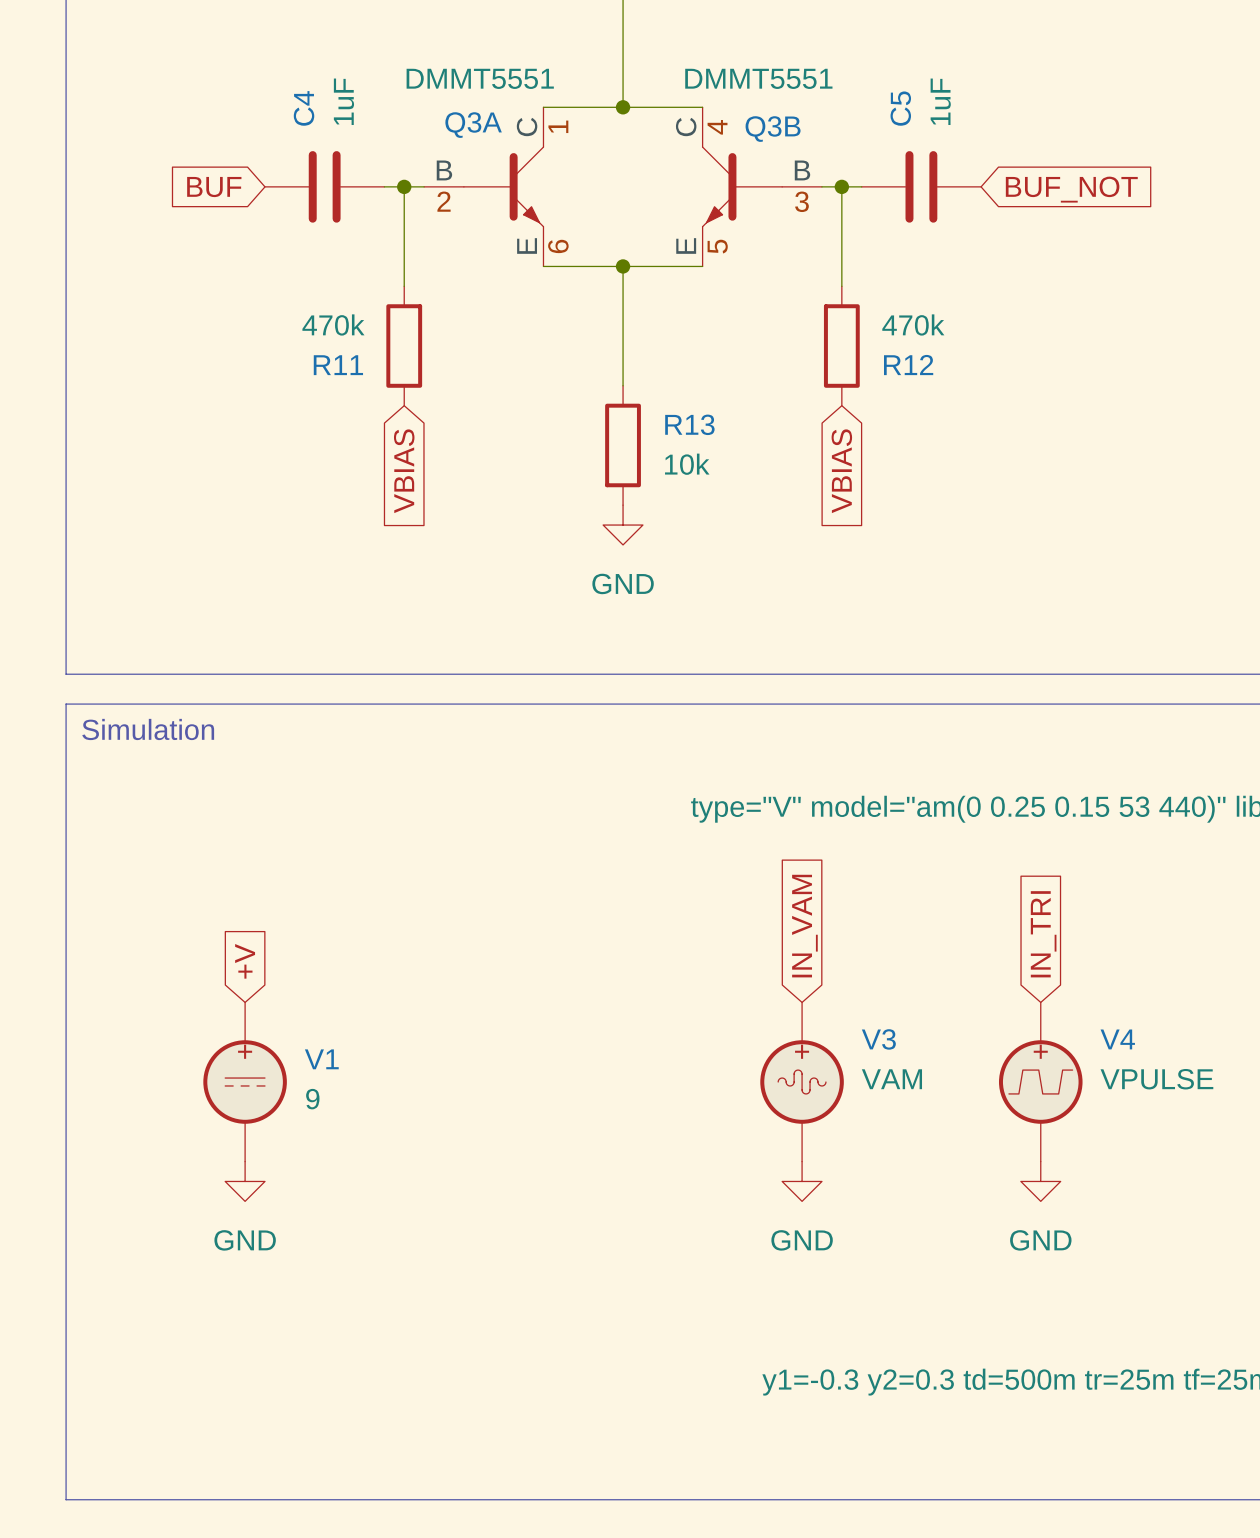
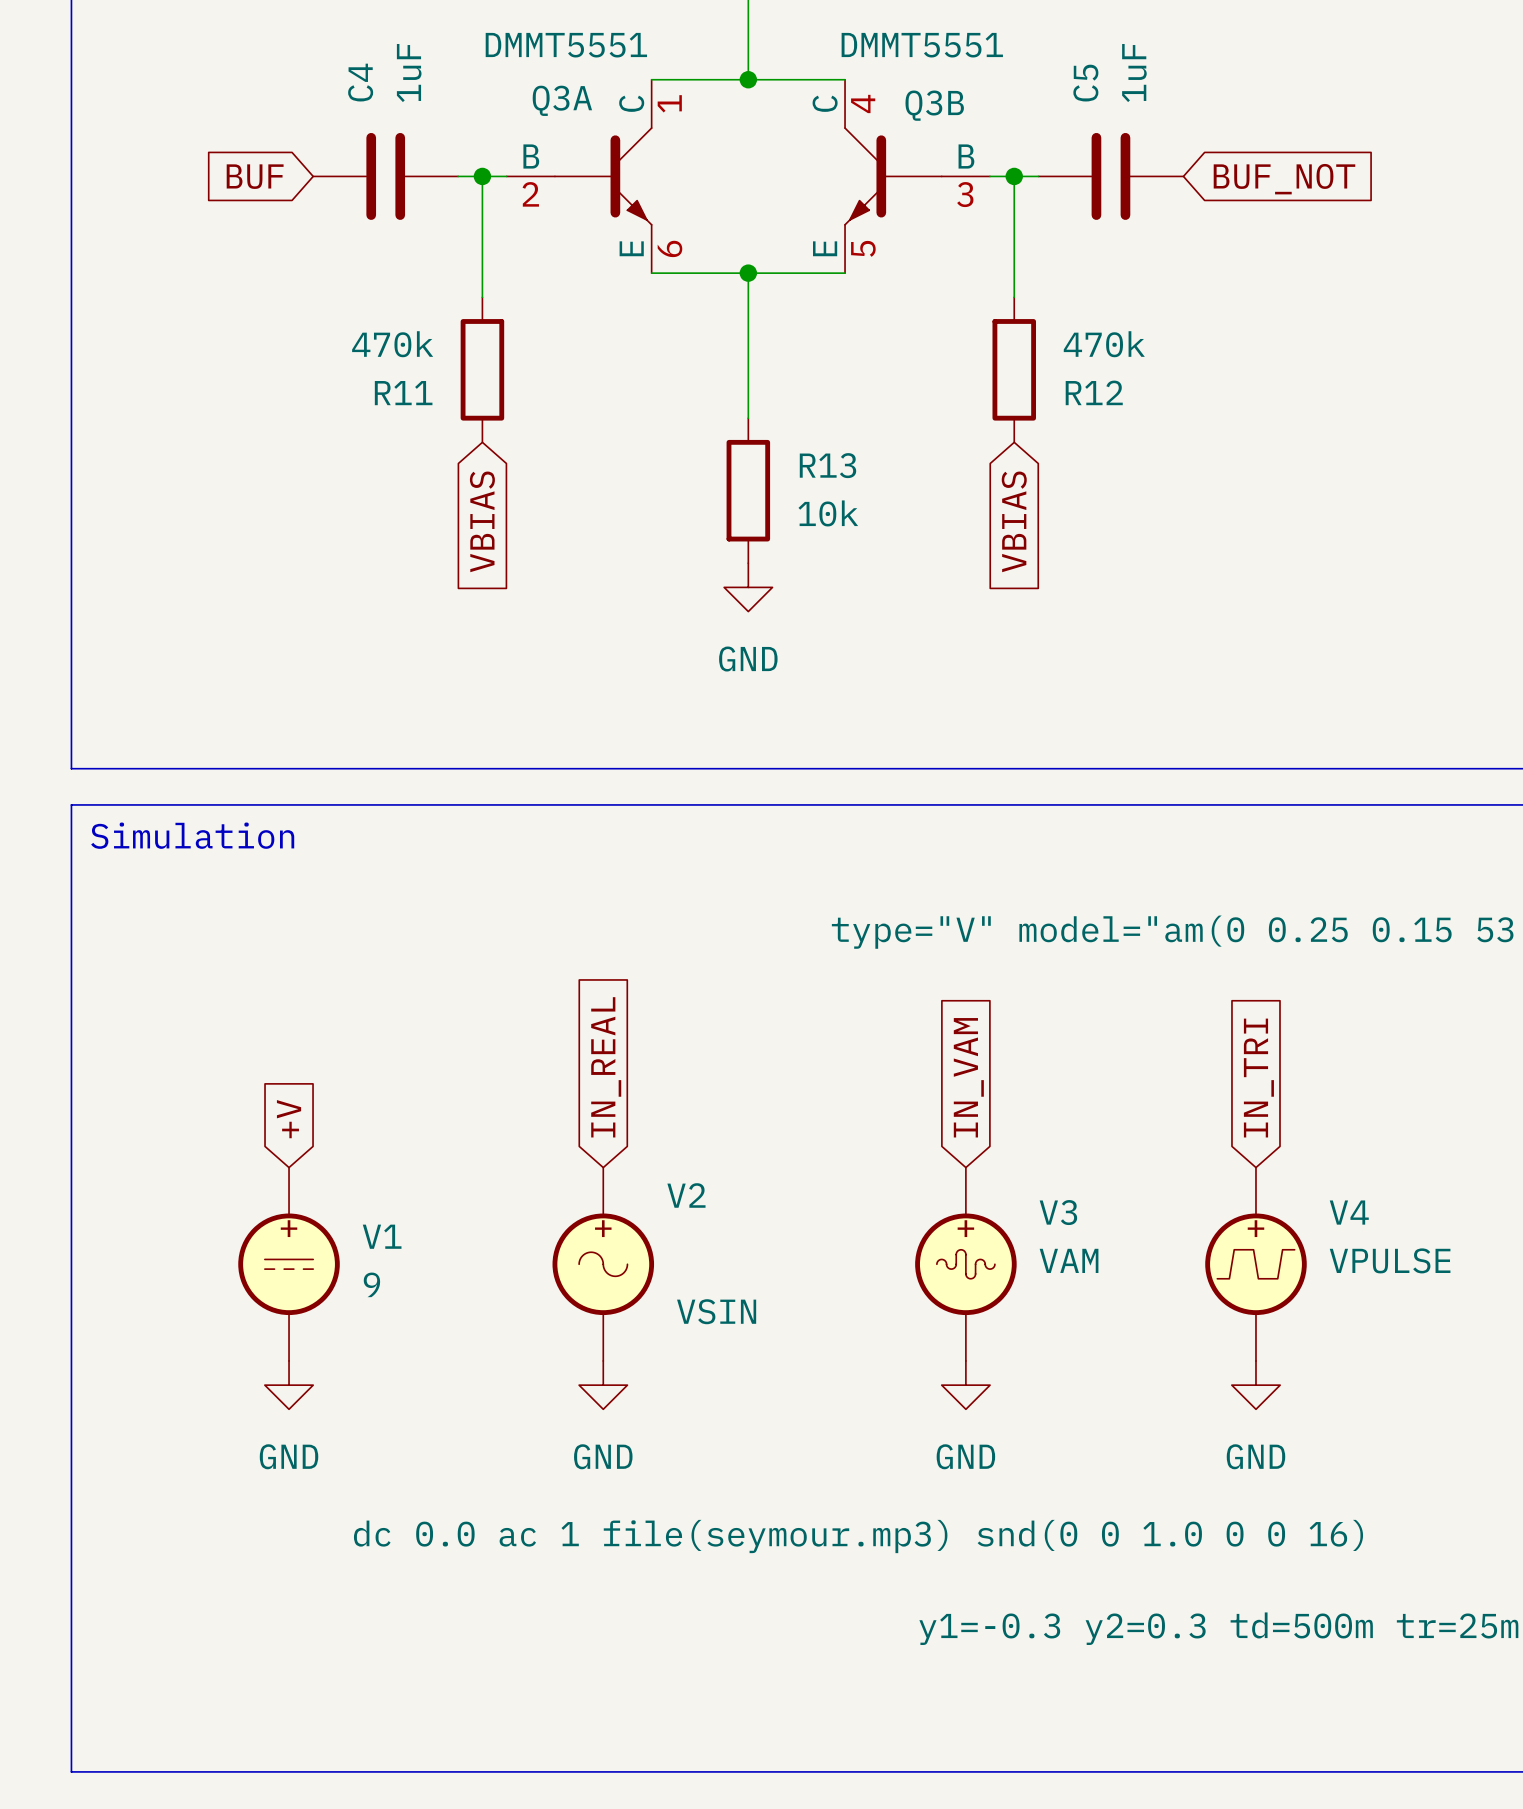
global label: none -> IN_REAL (606, 1067)
V2: none -> VSIN (603, 1264)
power symbol: none -> GND (603, 1385)

